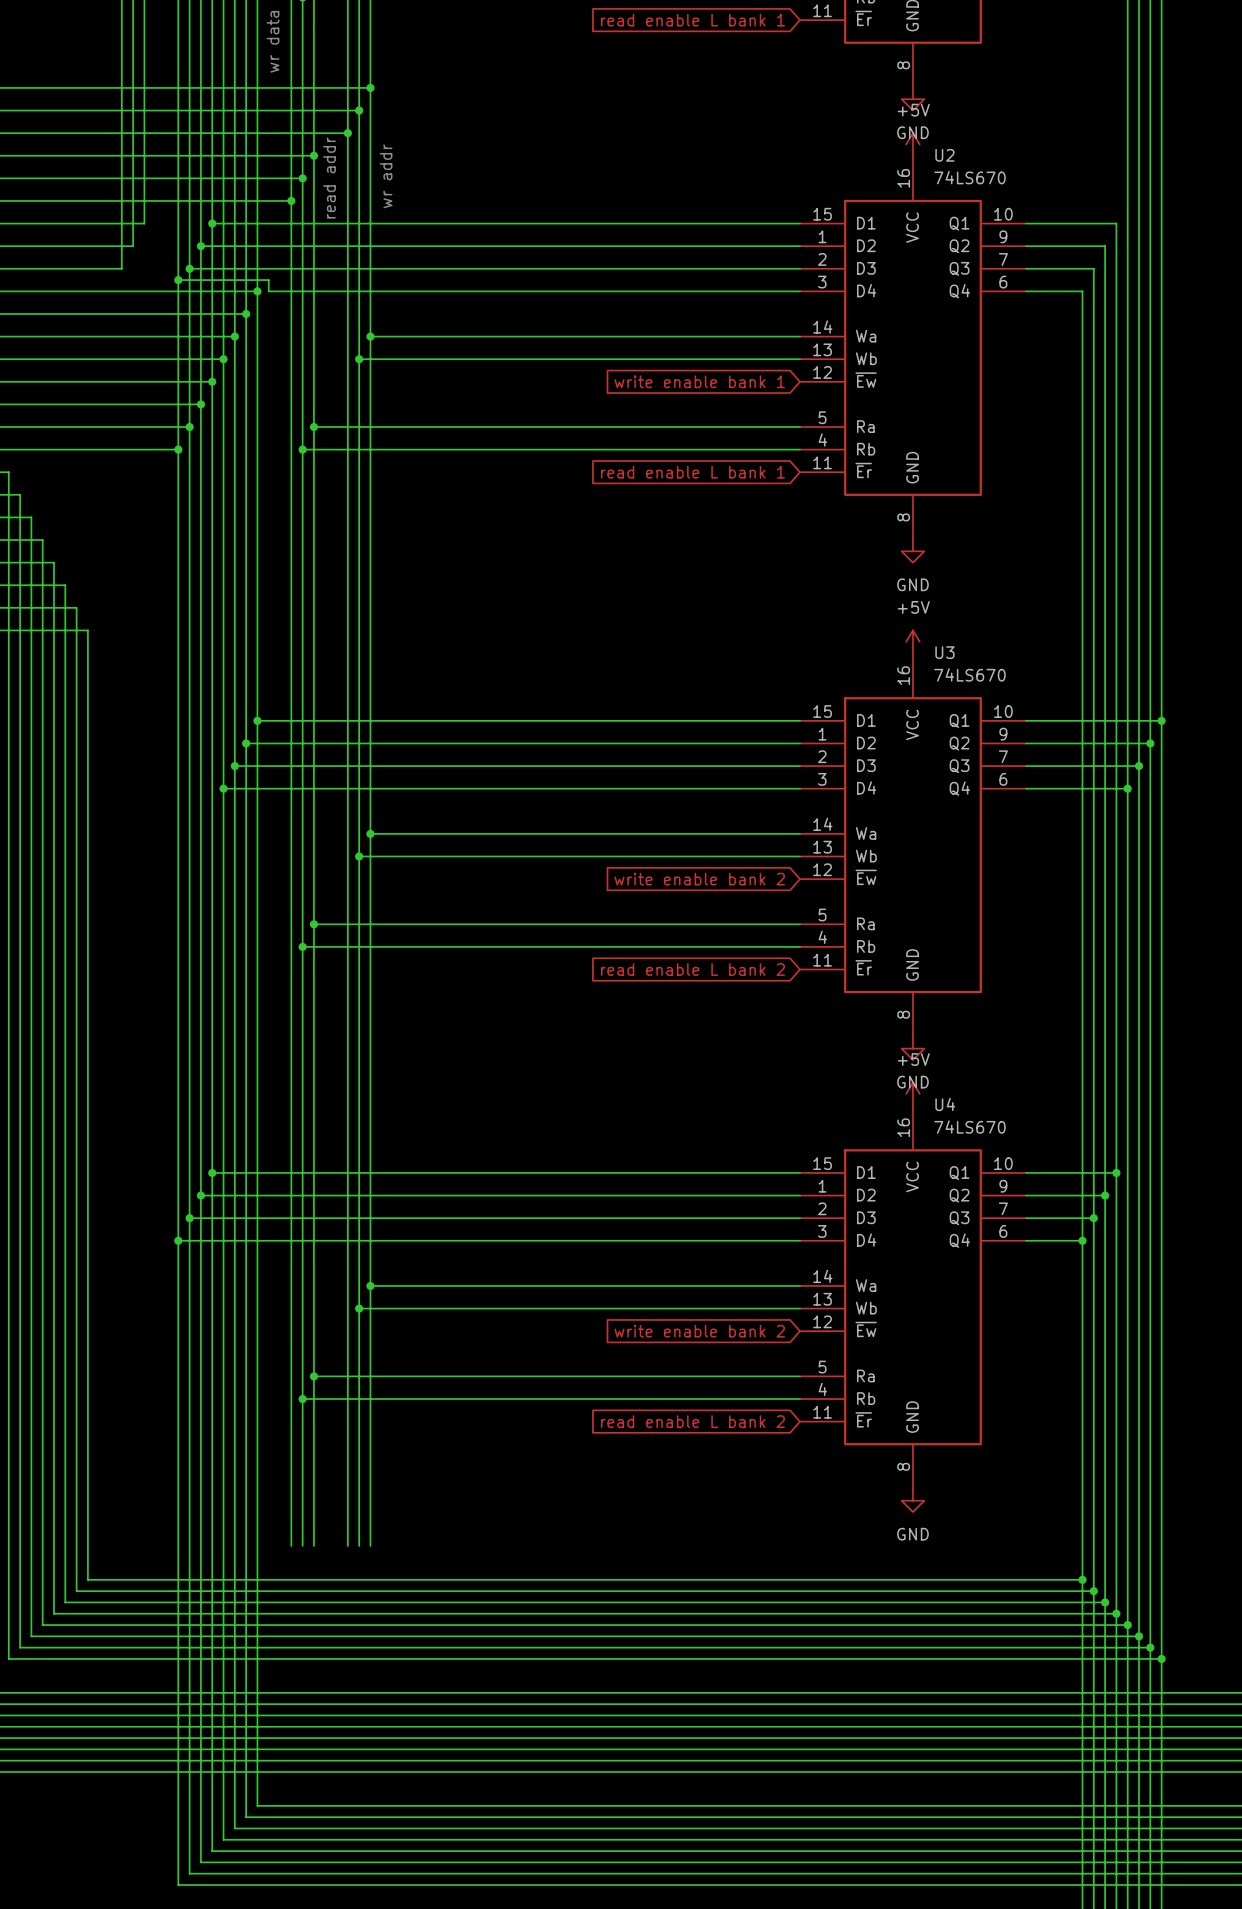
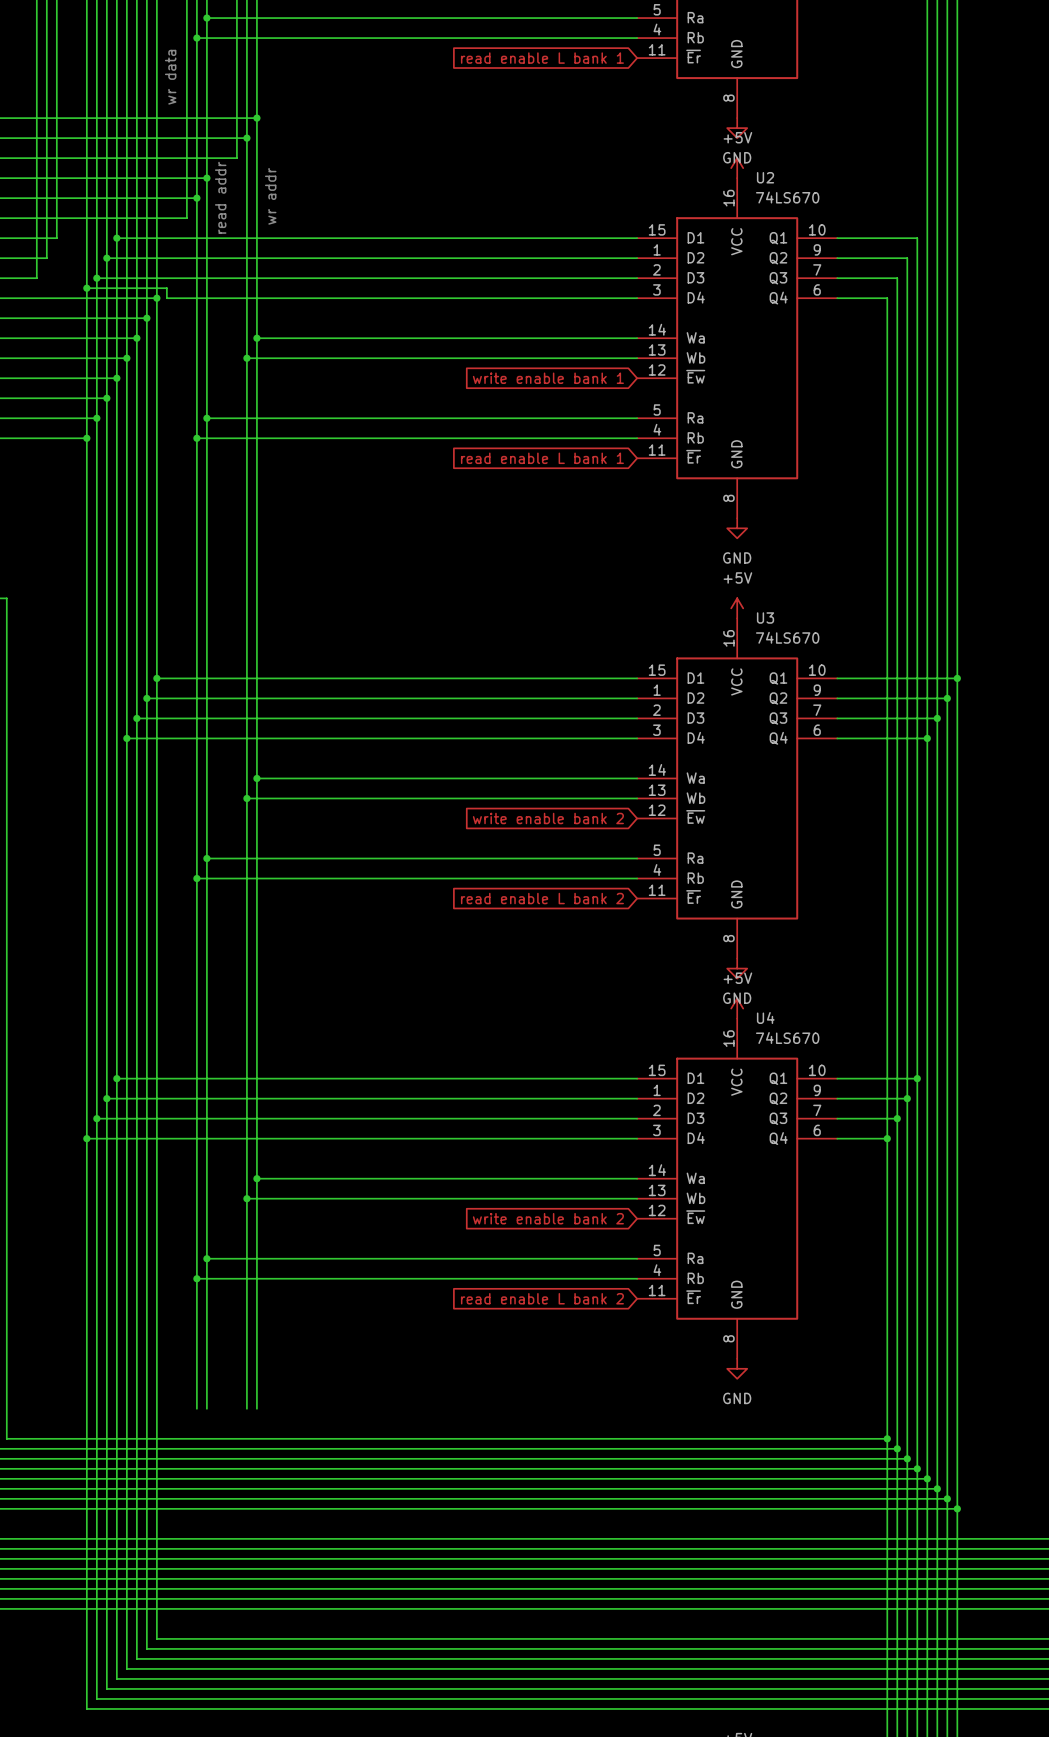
wire: (347, 133) (347, 1545) -> none
junction: (347, 133) -> none
wire: (291, 200) (291, 1545) -> none
junction: (291, 200) -> none

